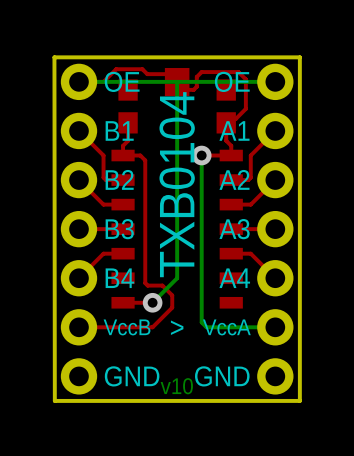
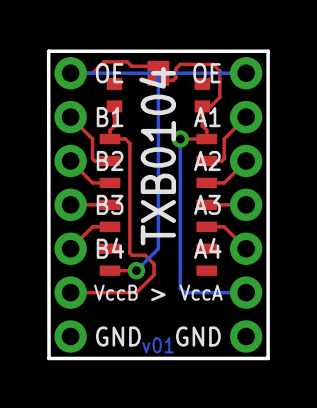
part footprint: [118, 79, 138, 134] -> [106, 77, 123, 113]
part footprint: [216, 79, 236, 134] -> [194, 77, 211, 113]
text: v10 (176, 386) -> v01 (158, 345)

